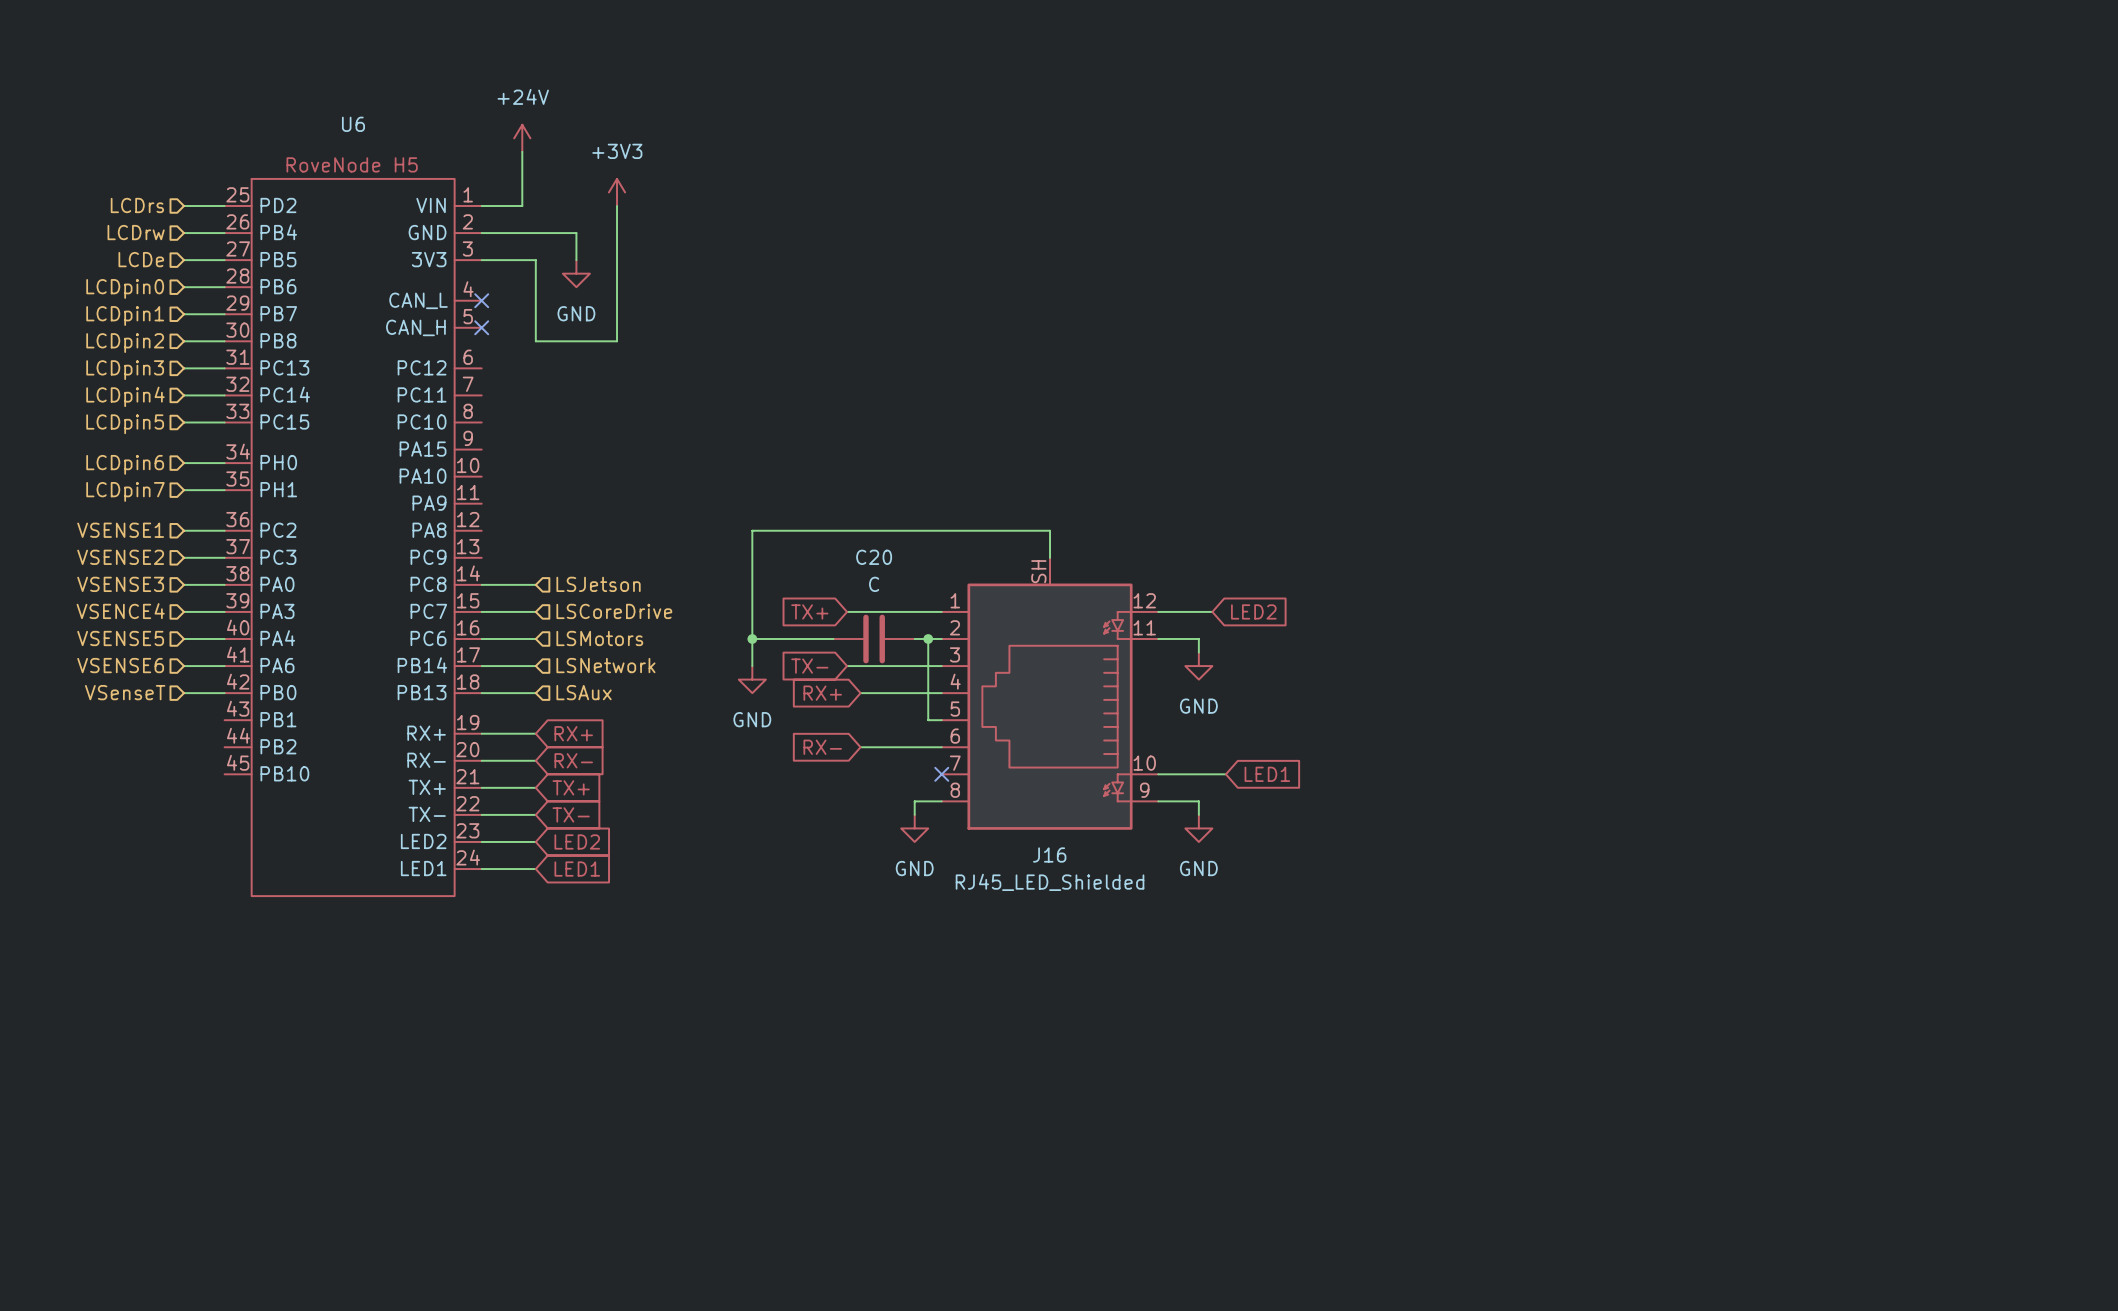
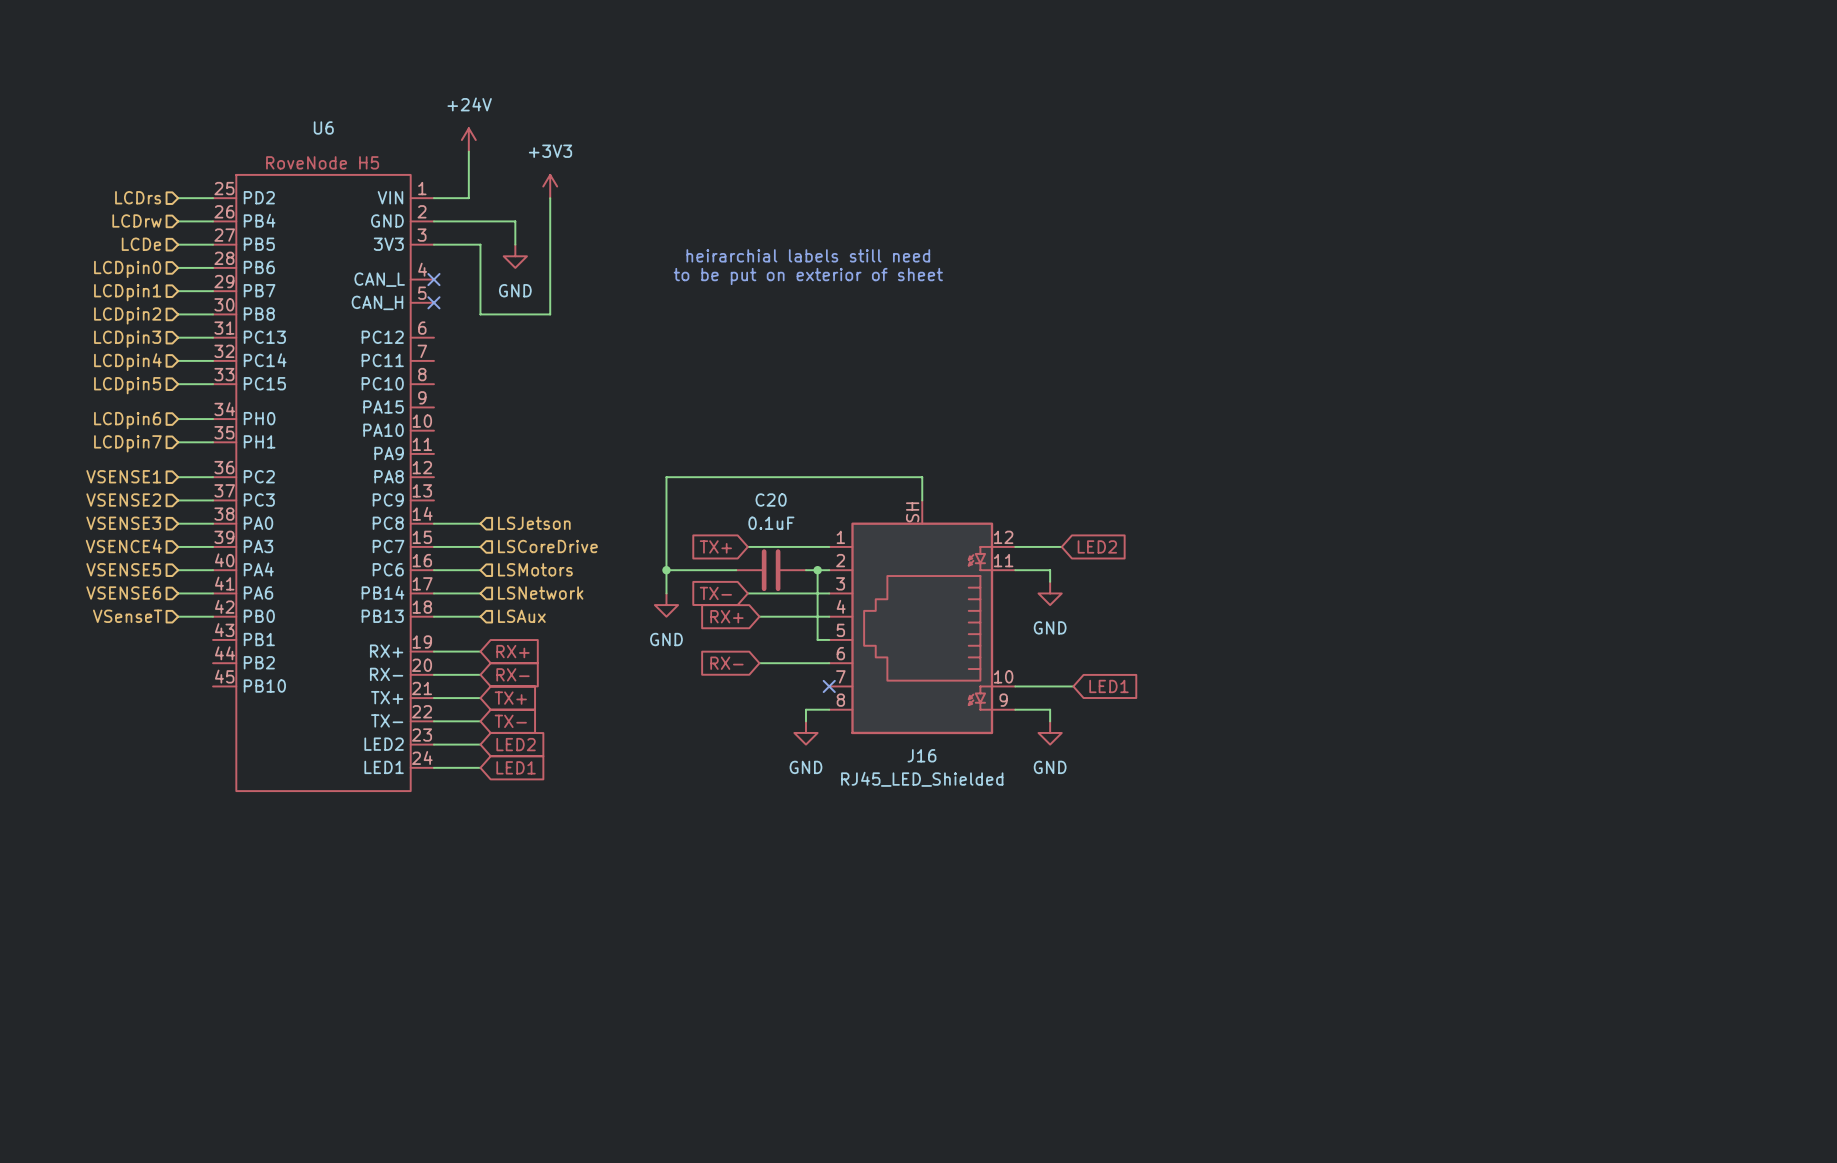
text: none -> heirarchial labels still need (808, 255)
text: none -> to be put on exterior of sheet (808, 276)
C20 value: C (874, 584) -> 0.1uF (771, 523)

